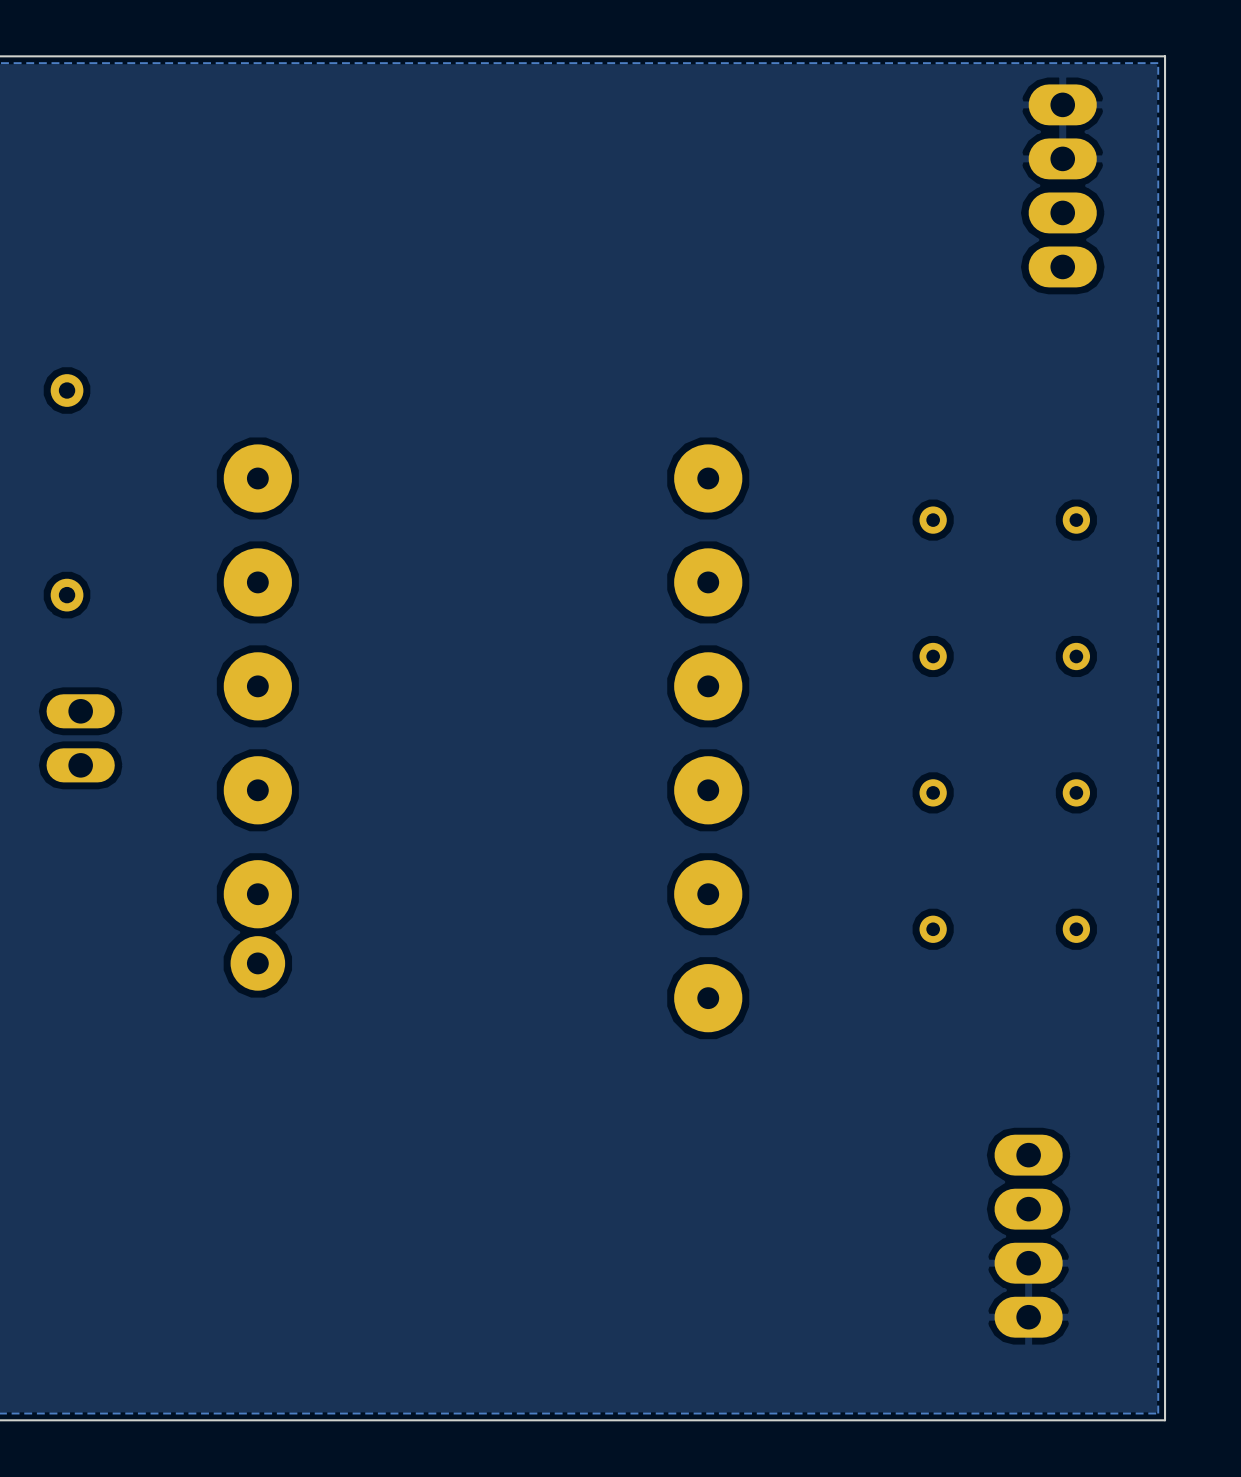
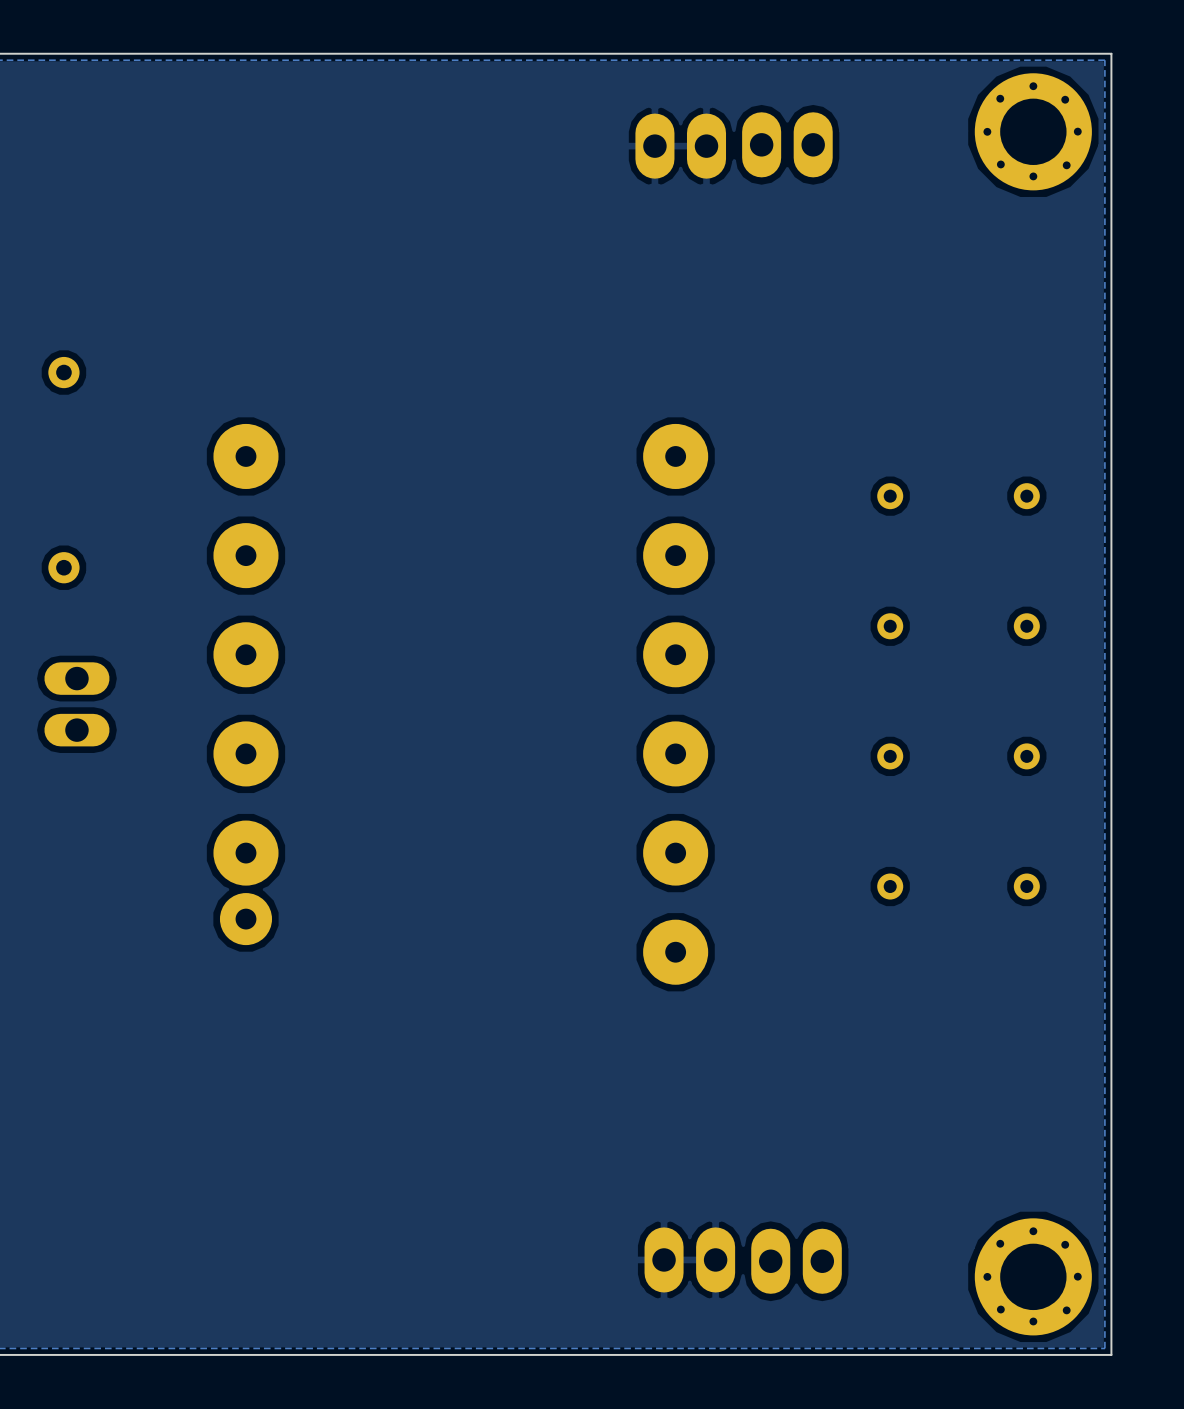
part: none -> (1033, 131)
part: none -> (787, 144)
part: none -> (680, 146)
part: (1062, 185) -> none
part: (1028, 1236) -> none
part: none -> (689, 1259)
part: none -> (796, 1261)
part: none -> (1033, 1276)

